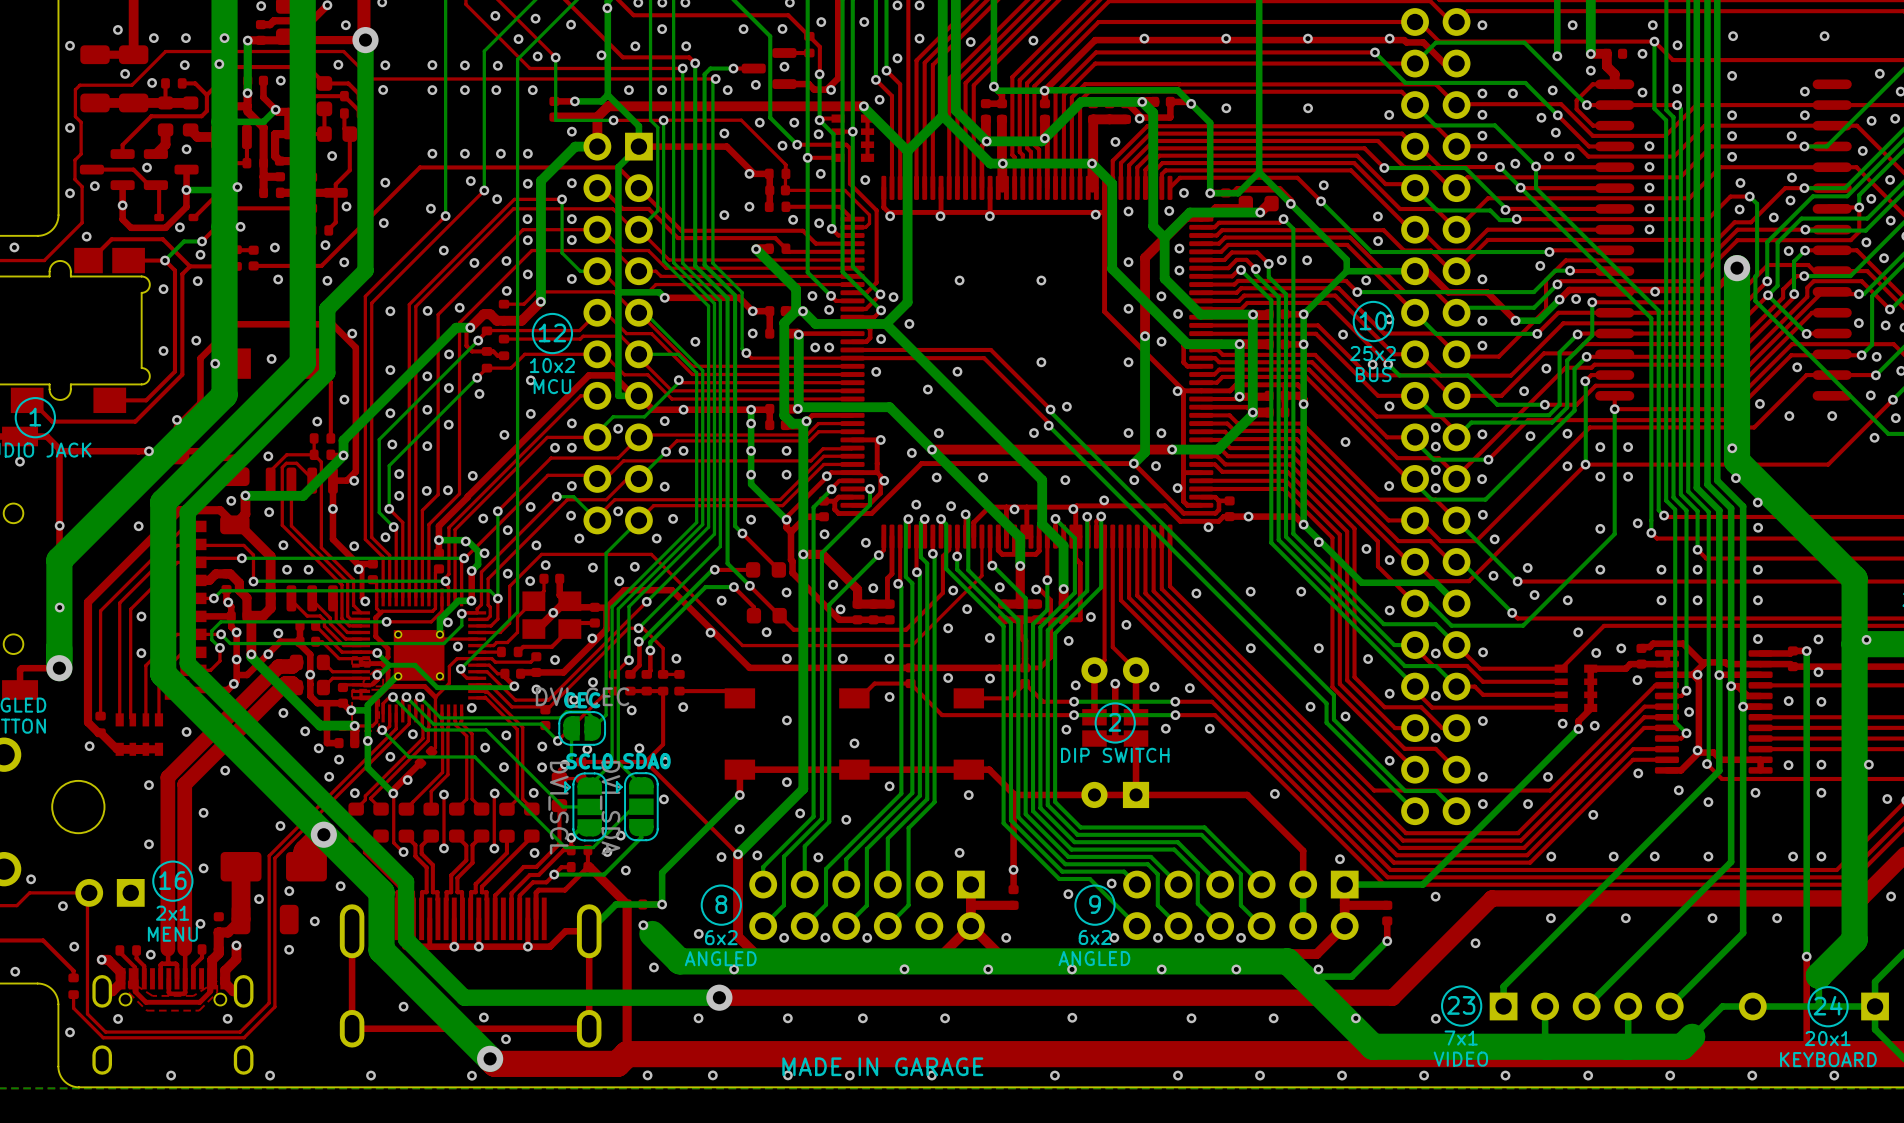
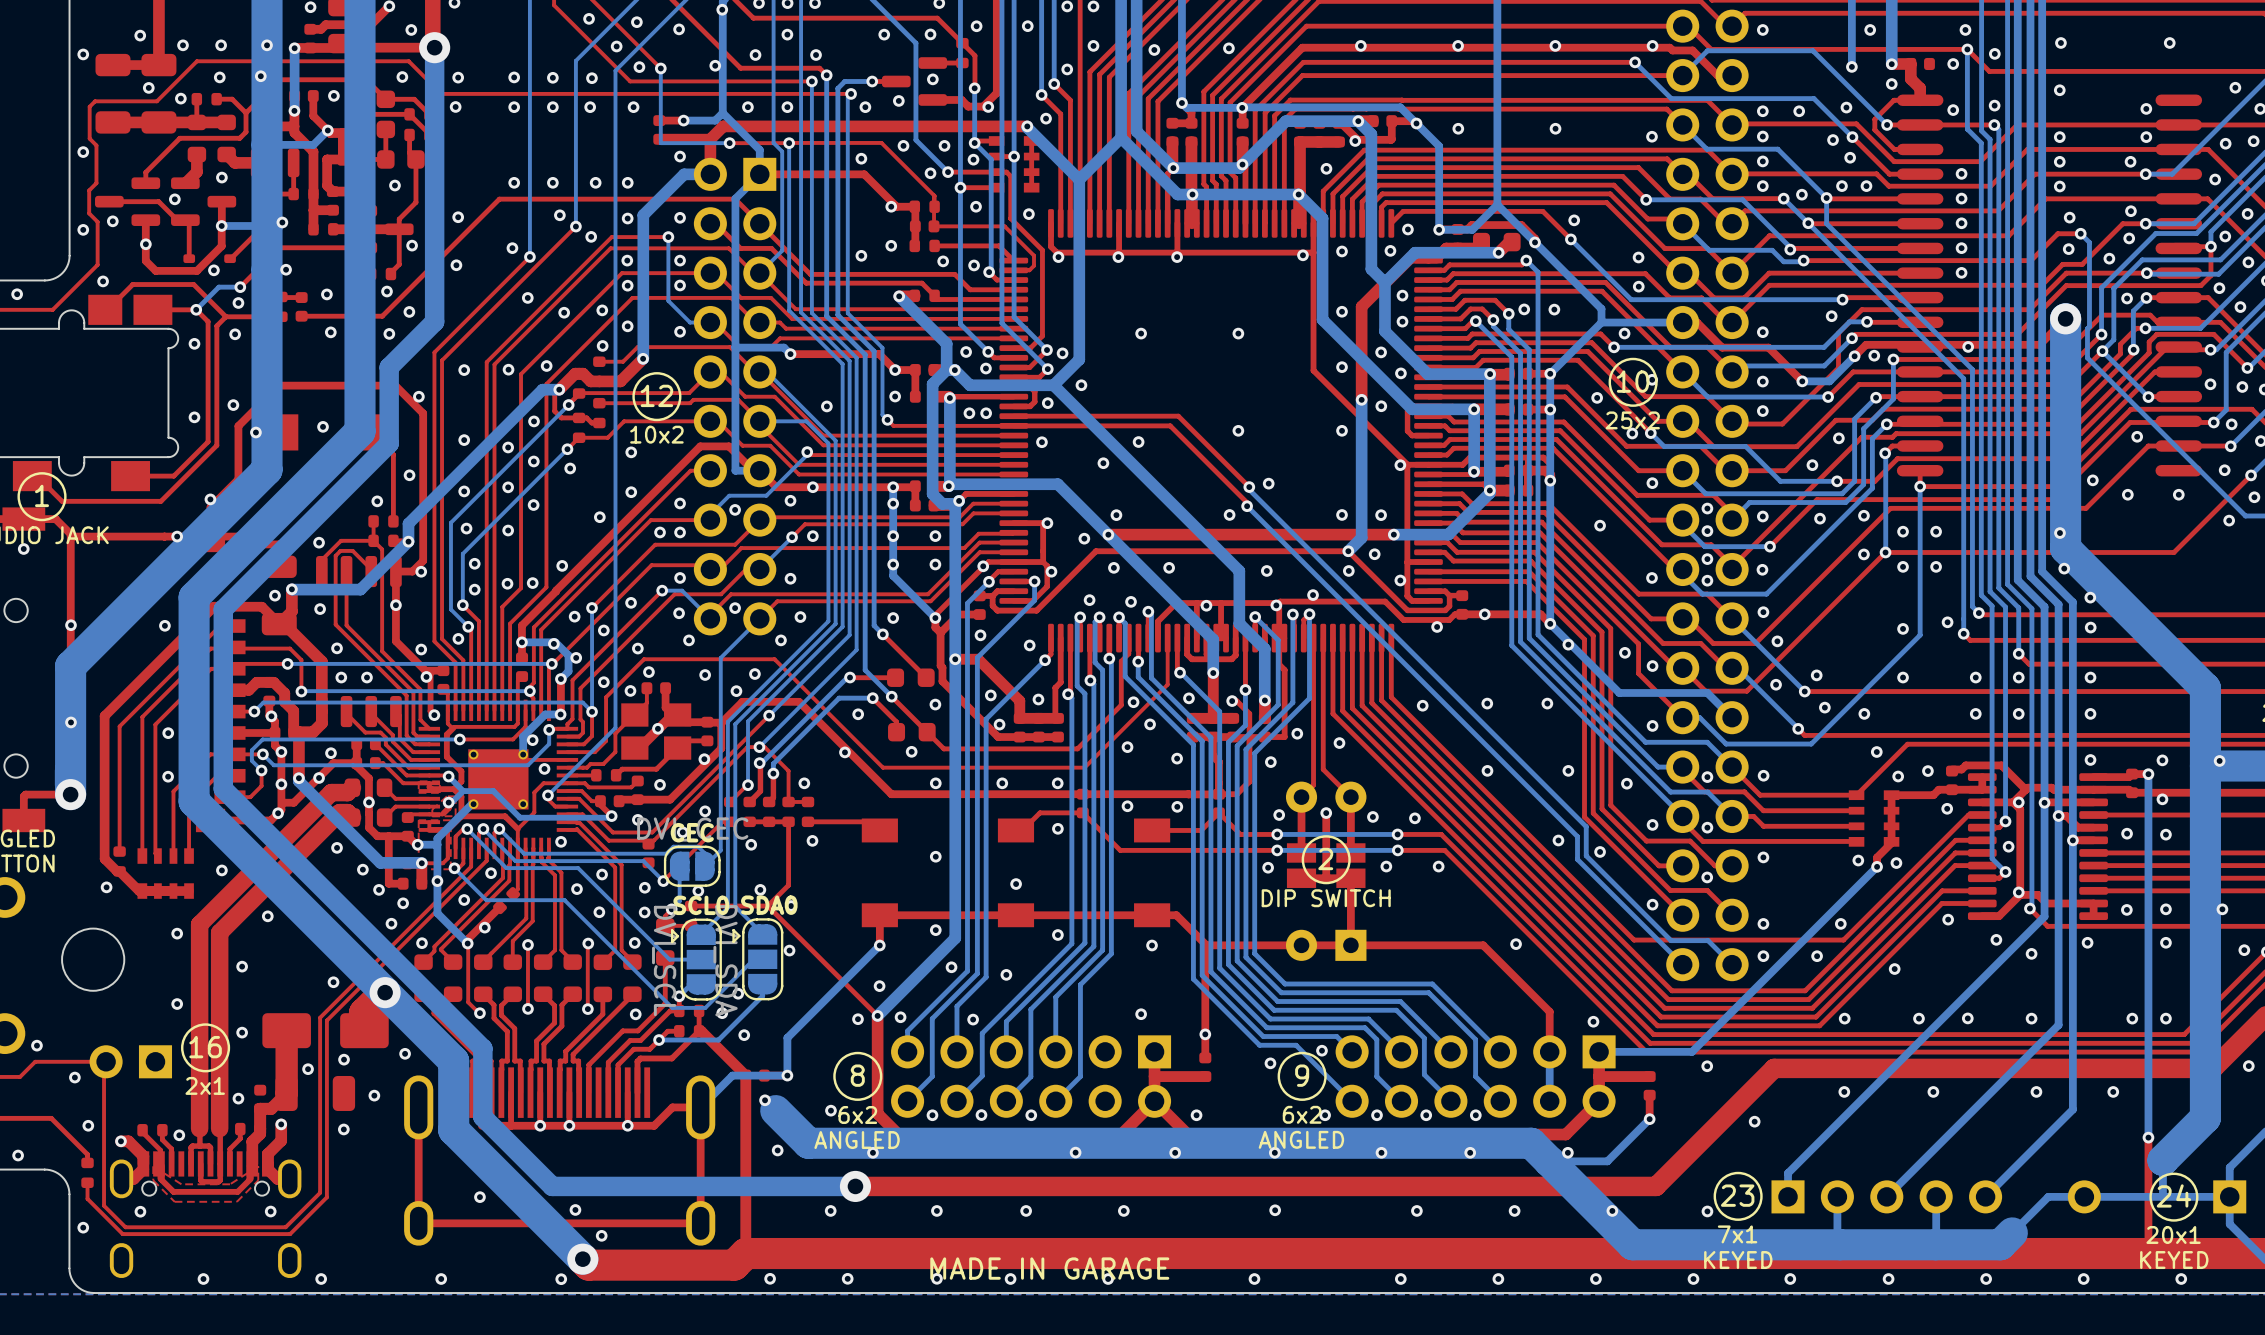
text: BUS (1373, 374) -> none
text: MCU (552, 386) -> none
text: MENU (172, 934) -> none
text: VIDEO (1460, 1059) -> KEYED (1738, 1260)
text: KEYBOARD (1828, 1059) -> KEYED (2174, 1260)

